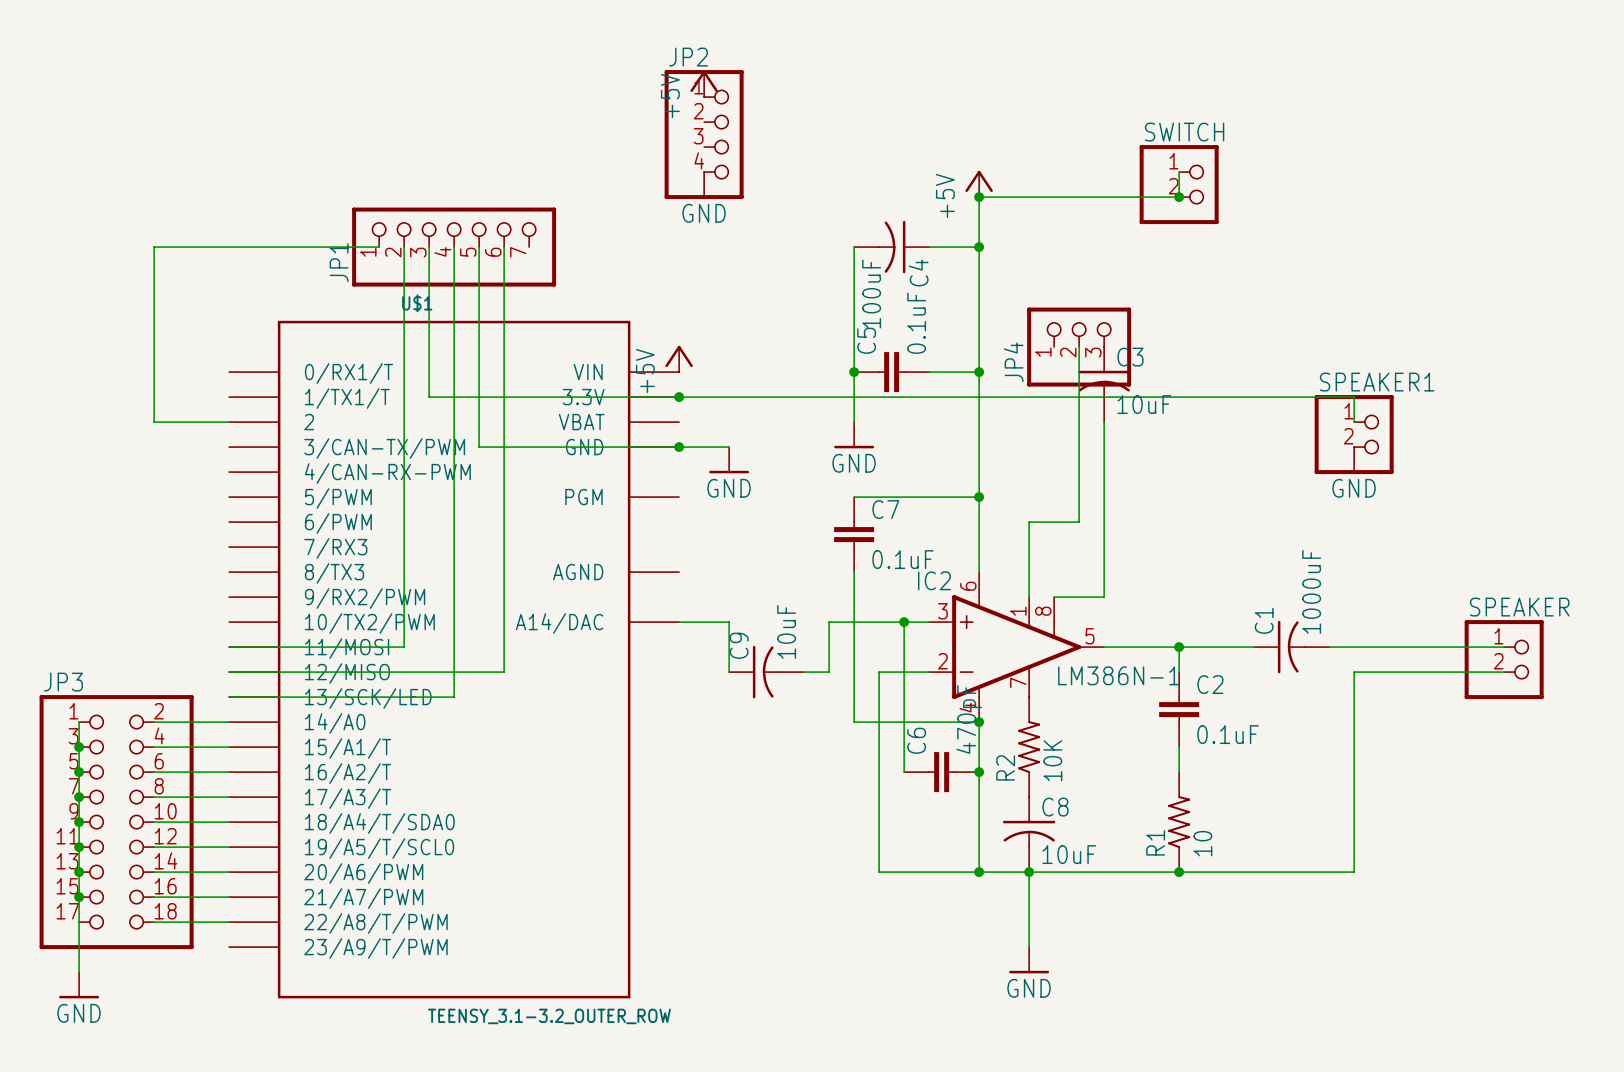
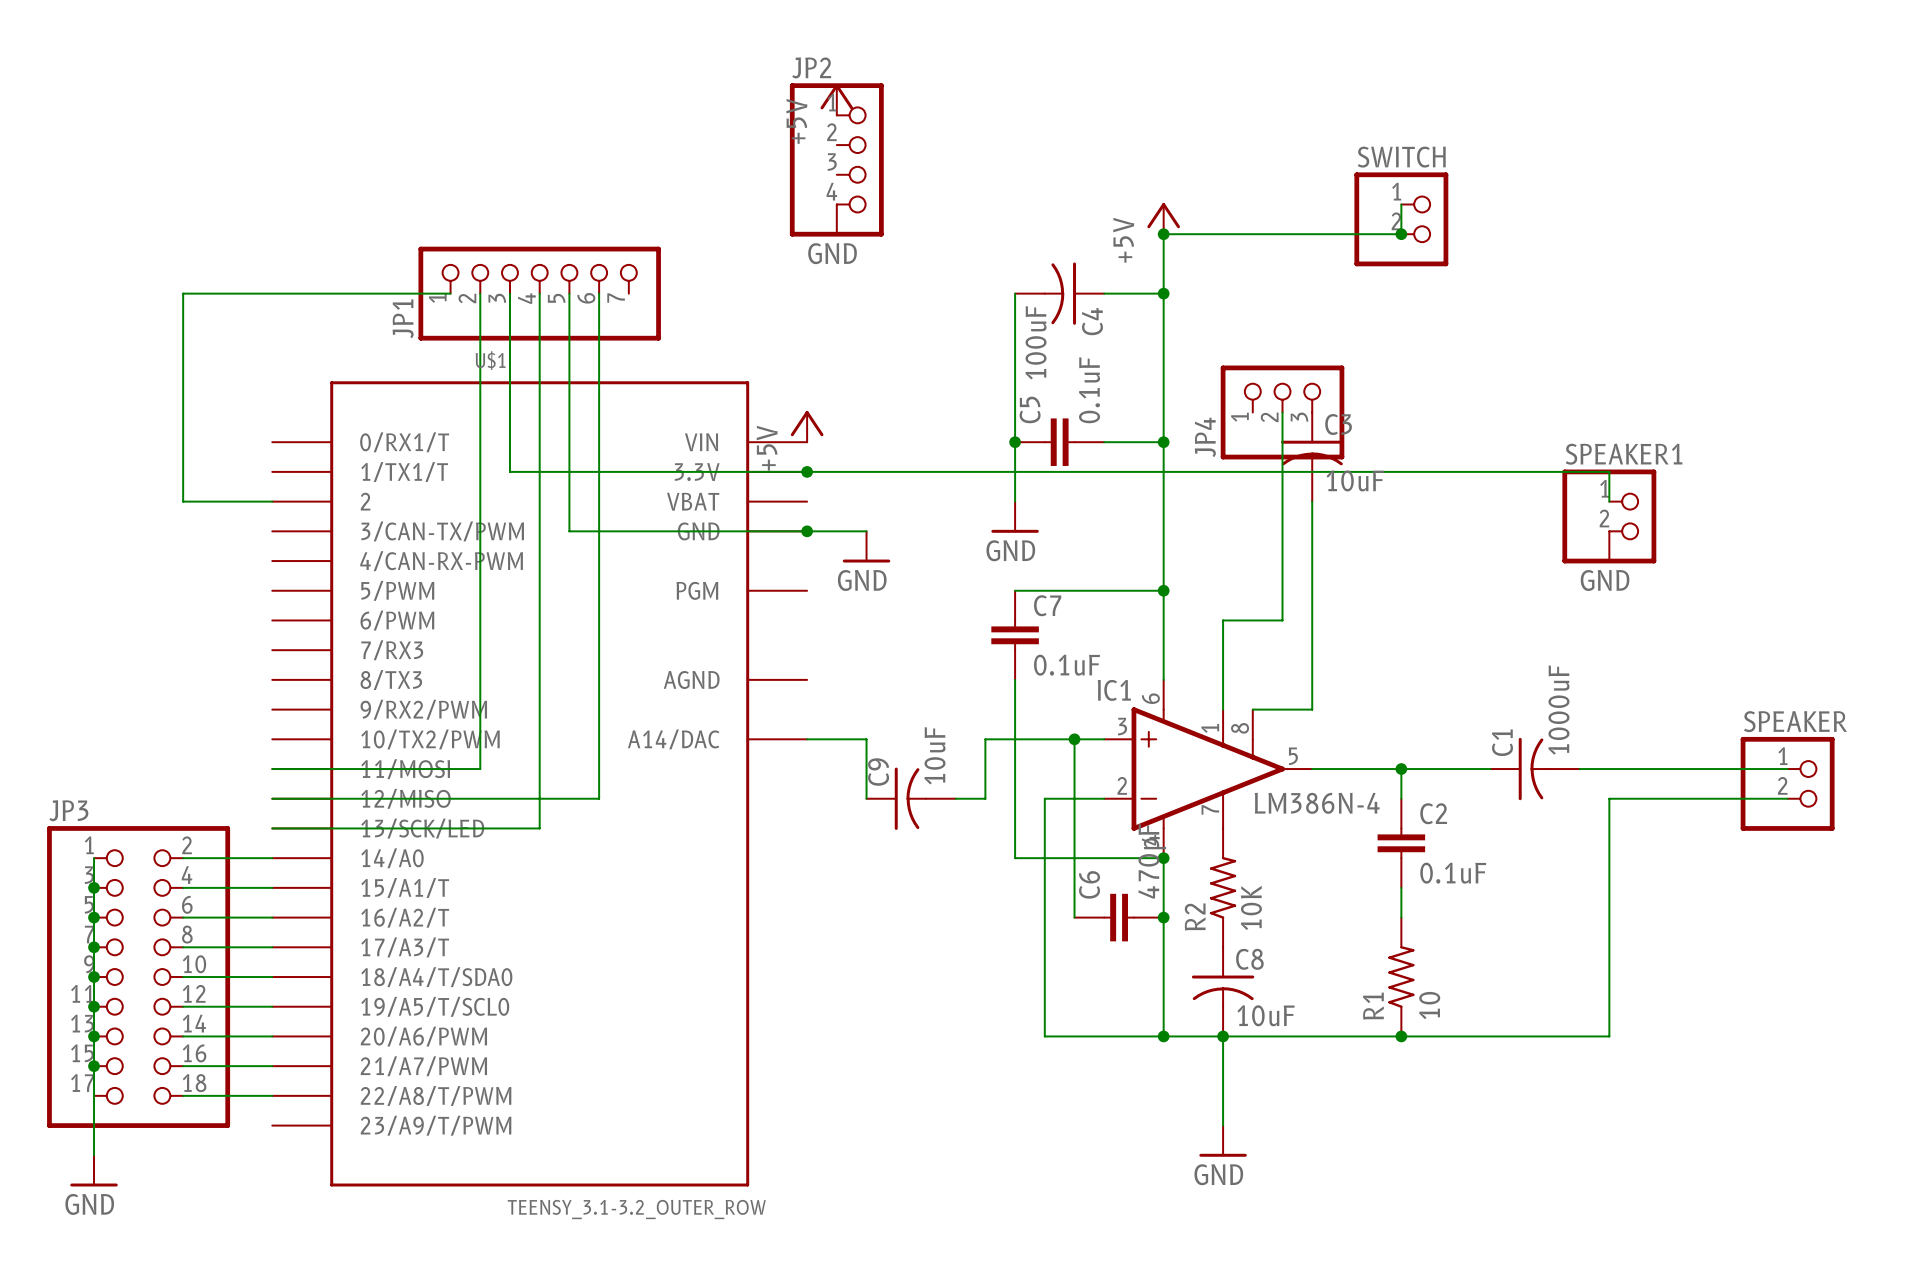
IC2 name: IC2 (934, 580) -> IC1 (1114, 690)
IC2 value: LM386N-1 (1118, 675) -> LM386N-4 (1317, 803)

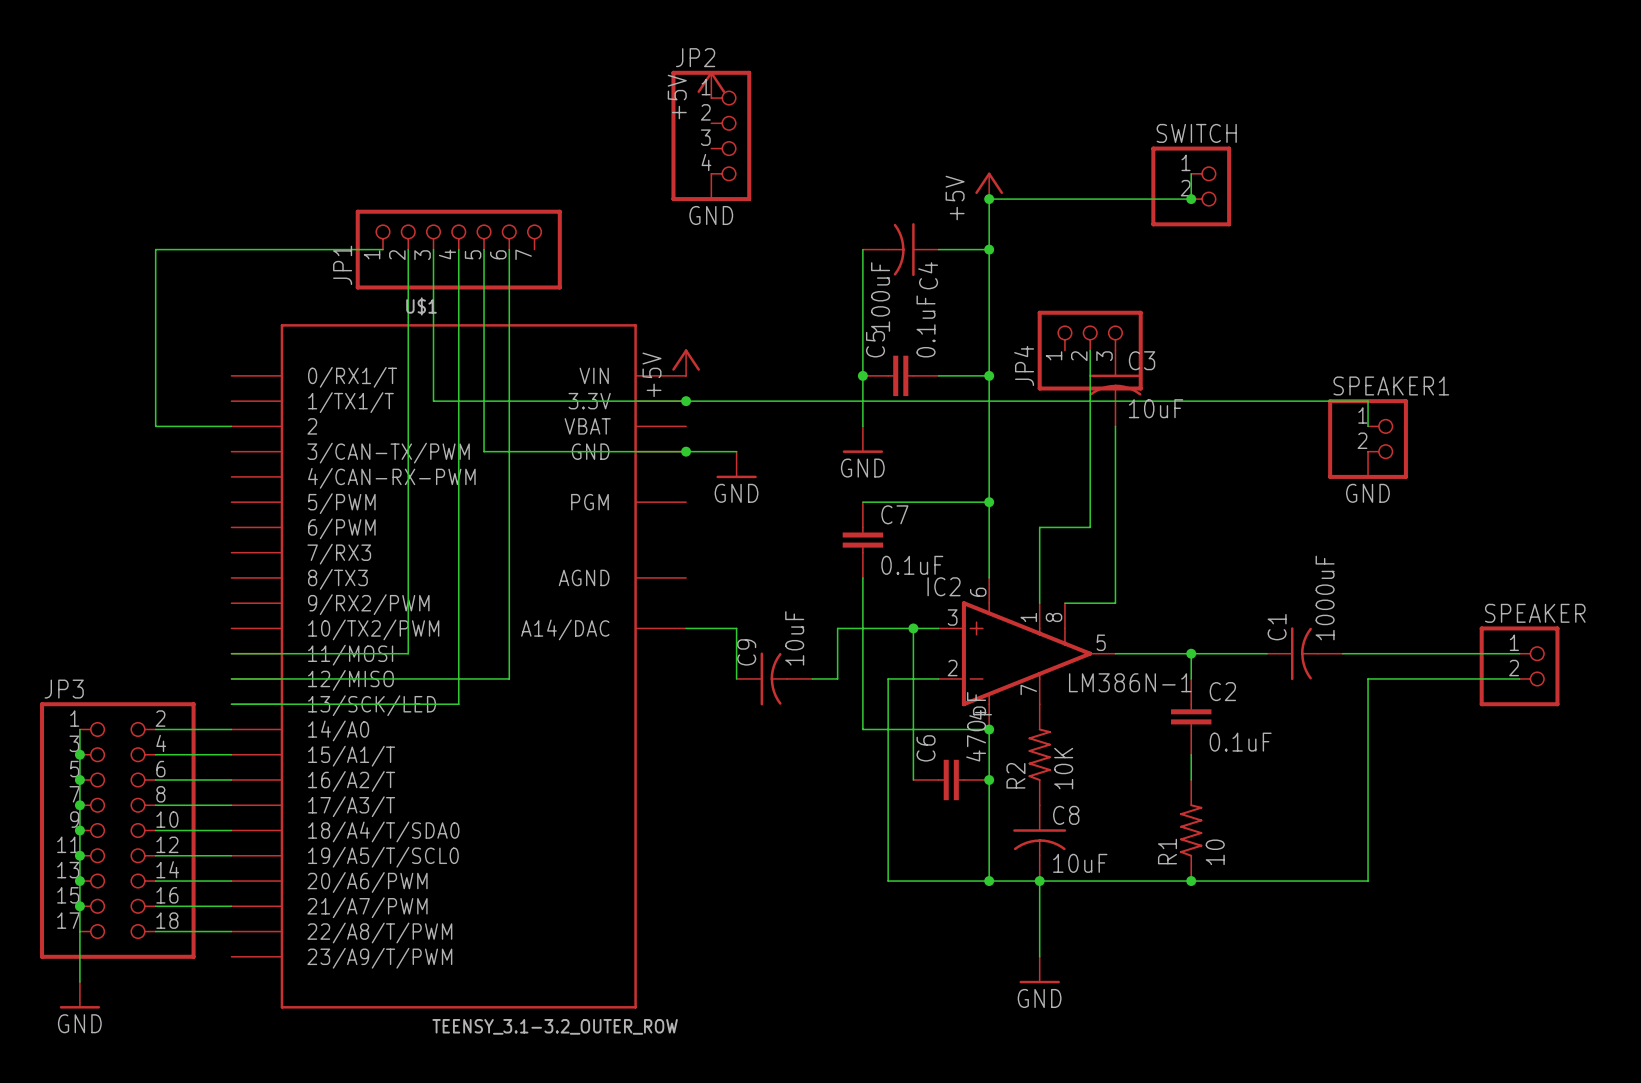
IC1 name: IC1 (1114, 690) -> IC2 (944, 586)
IC1 value: LM386N-4 (1317, 803) -> LM386N-1 (1130, 682)

